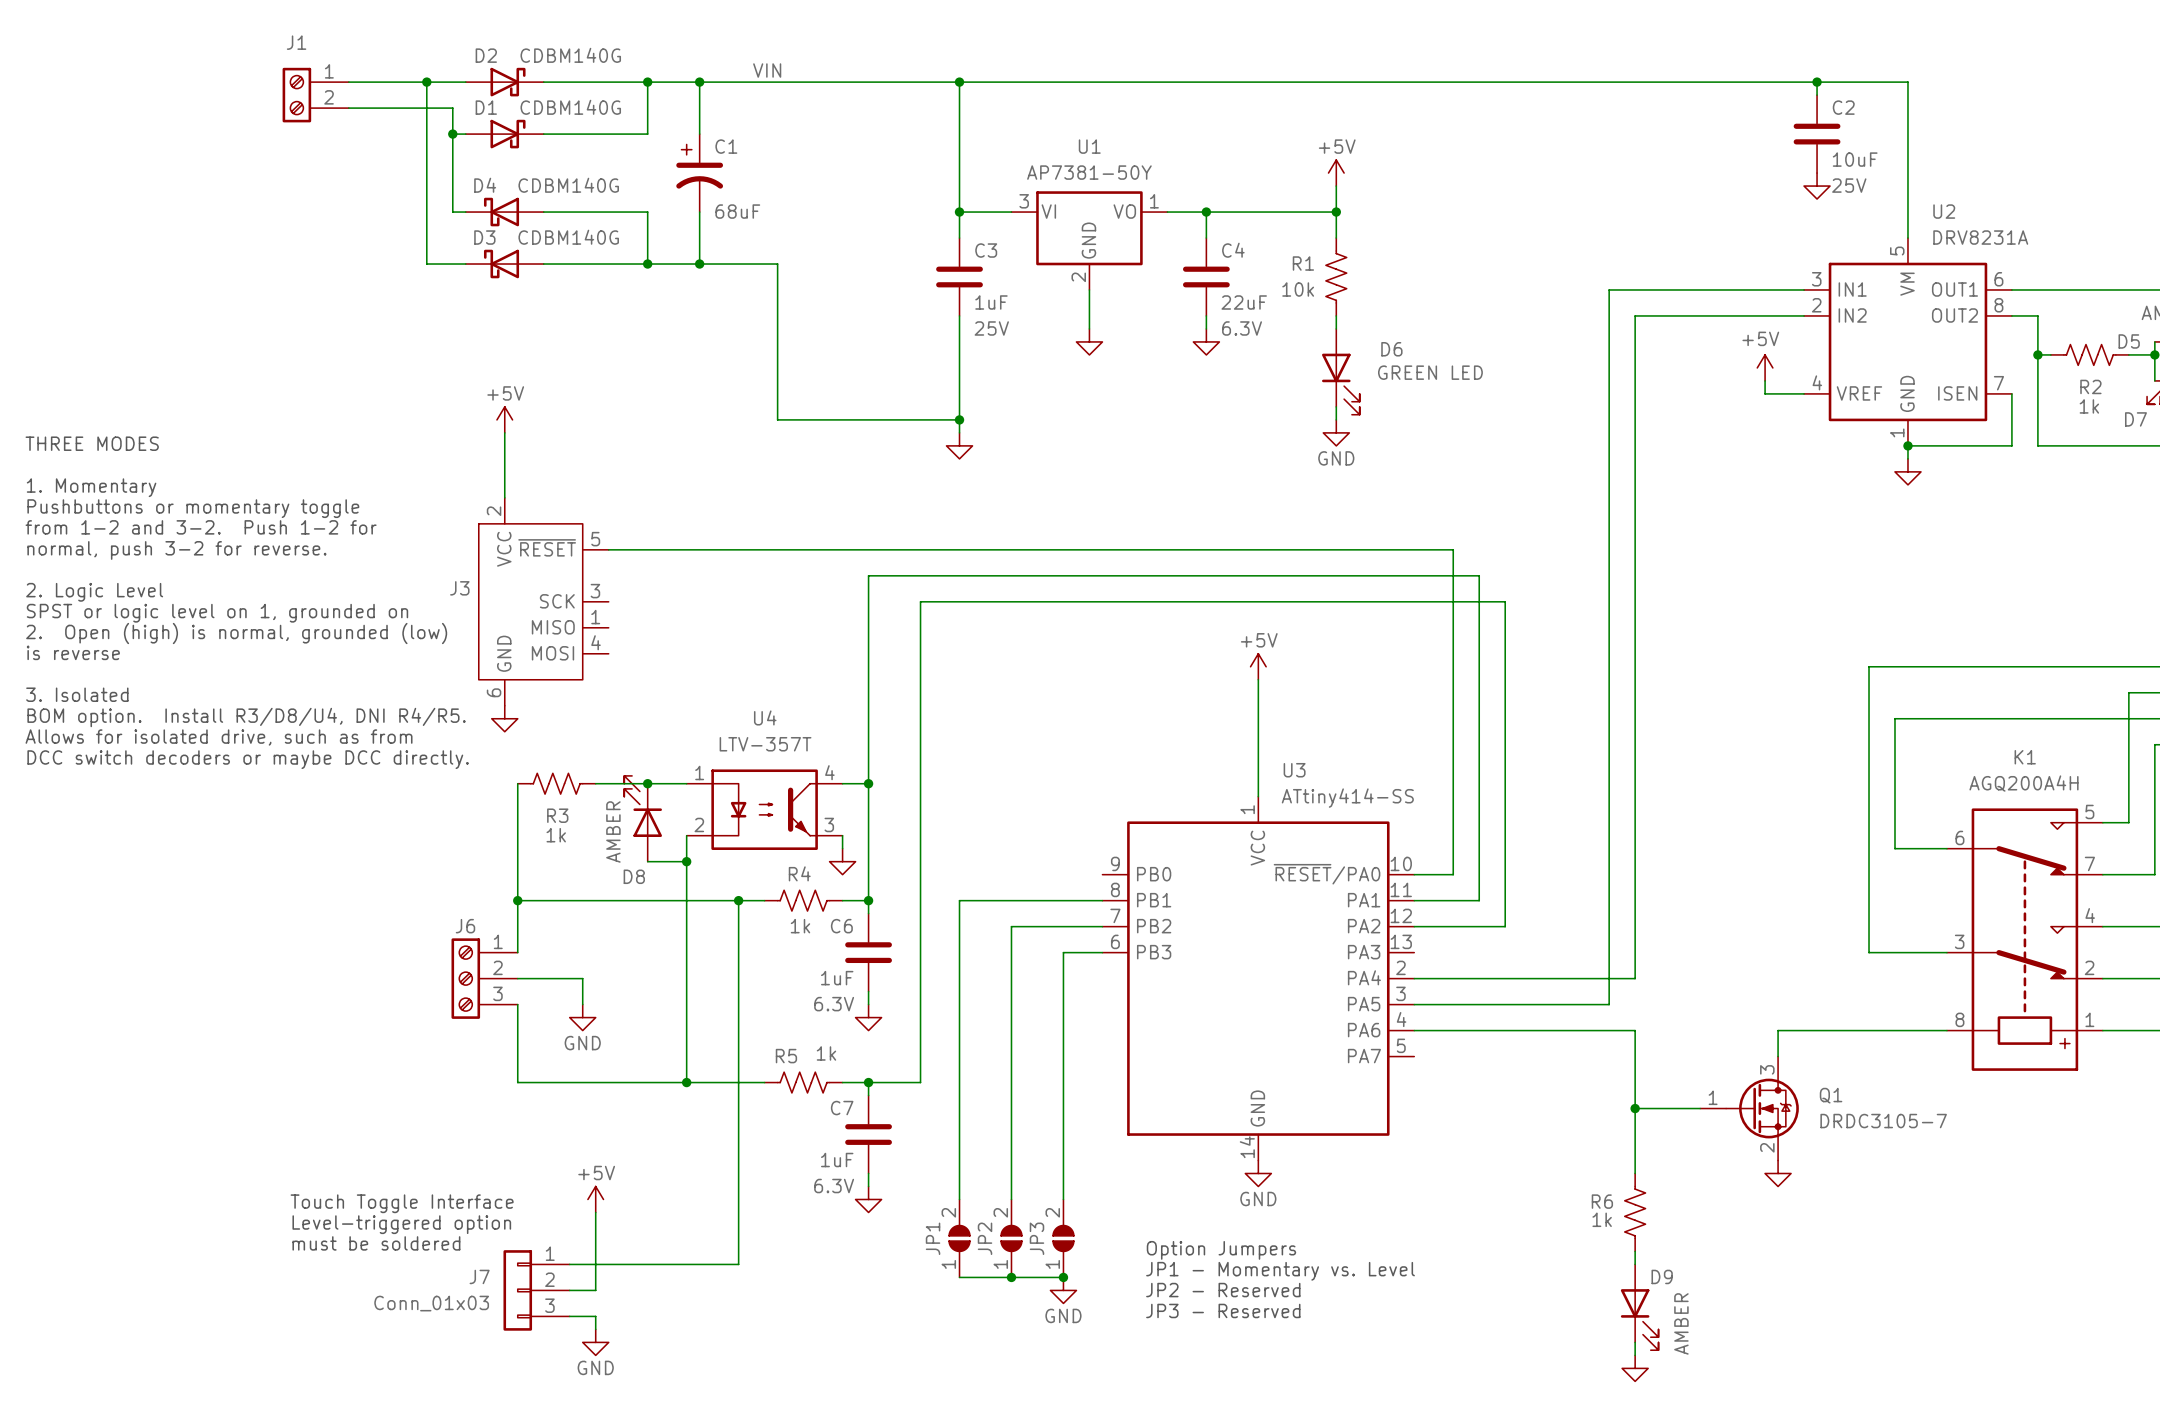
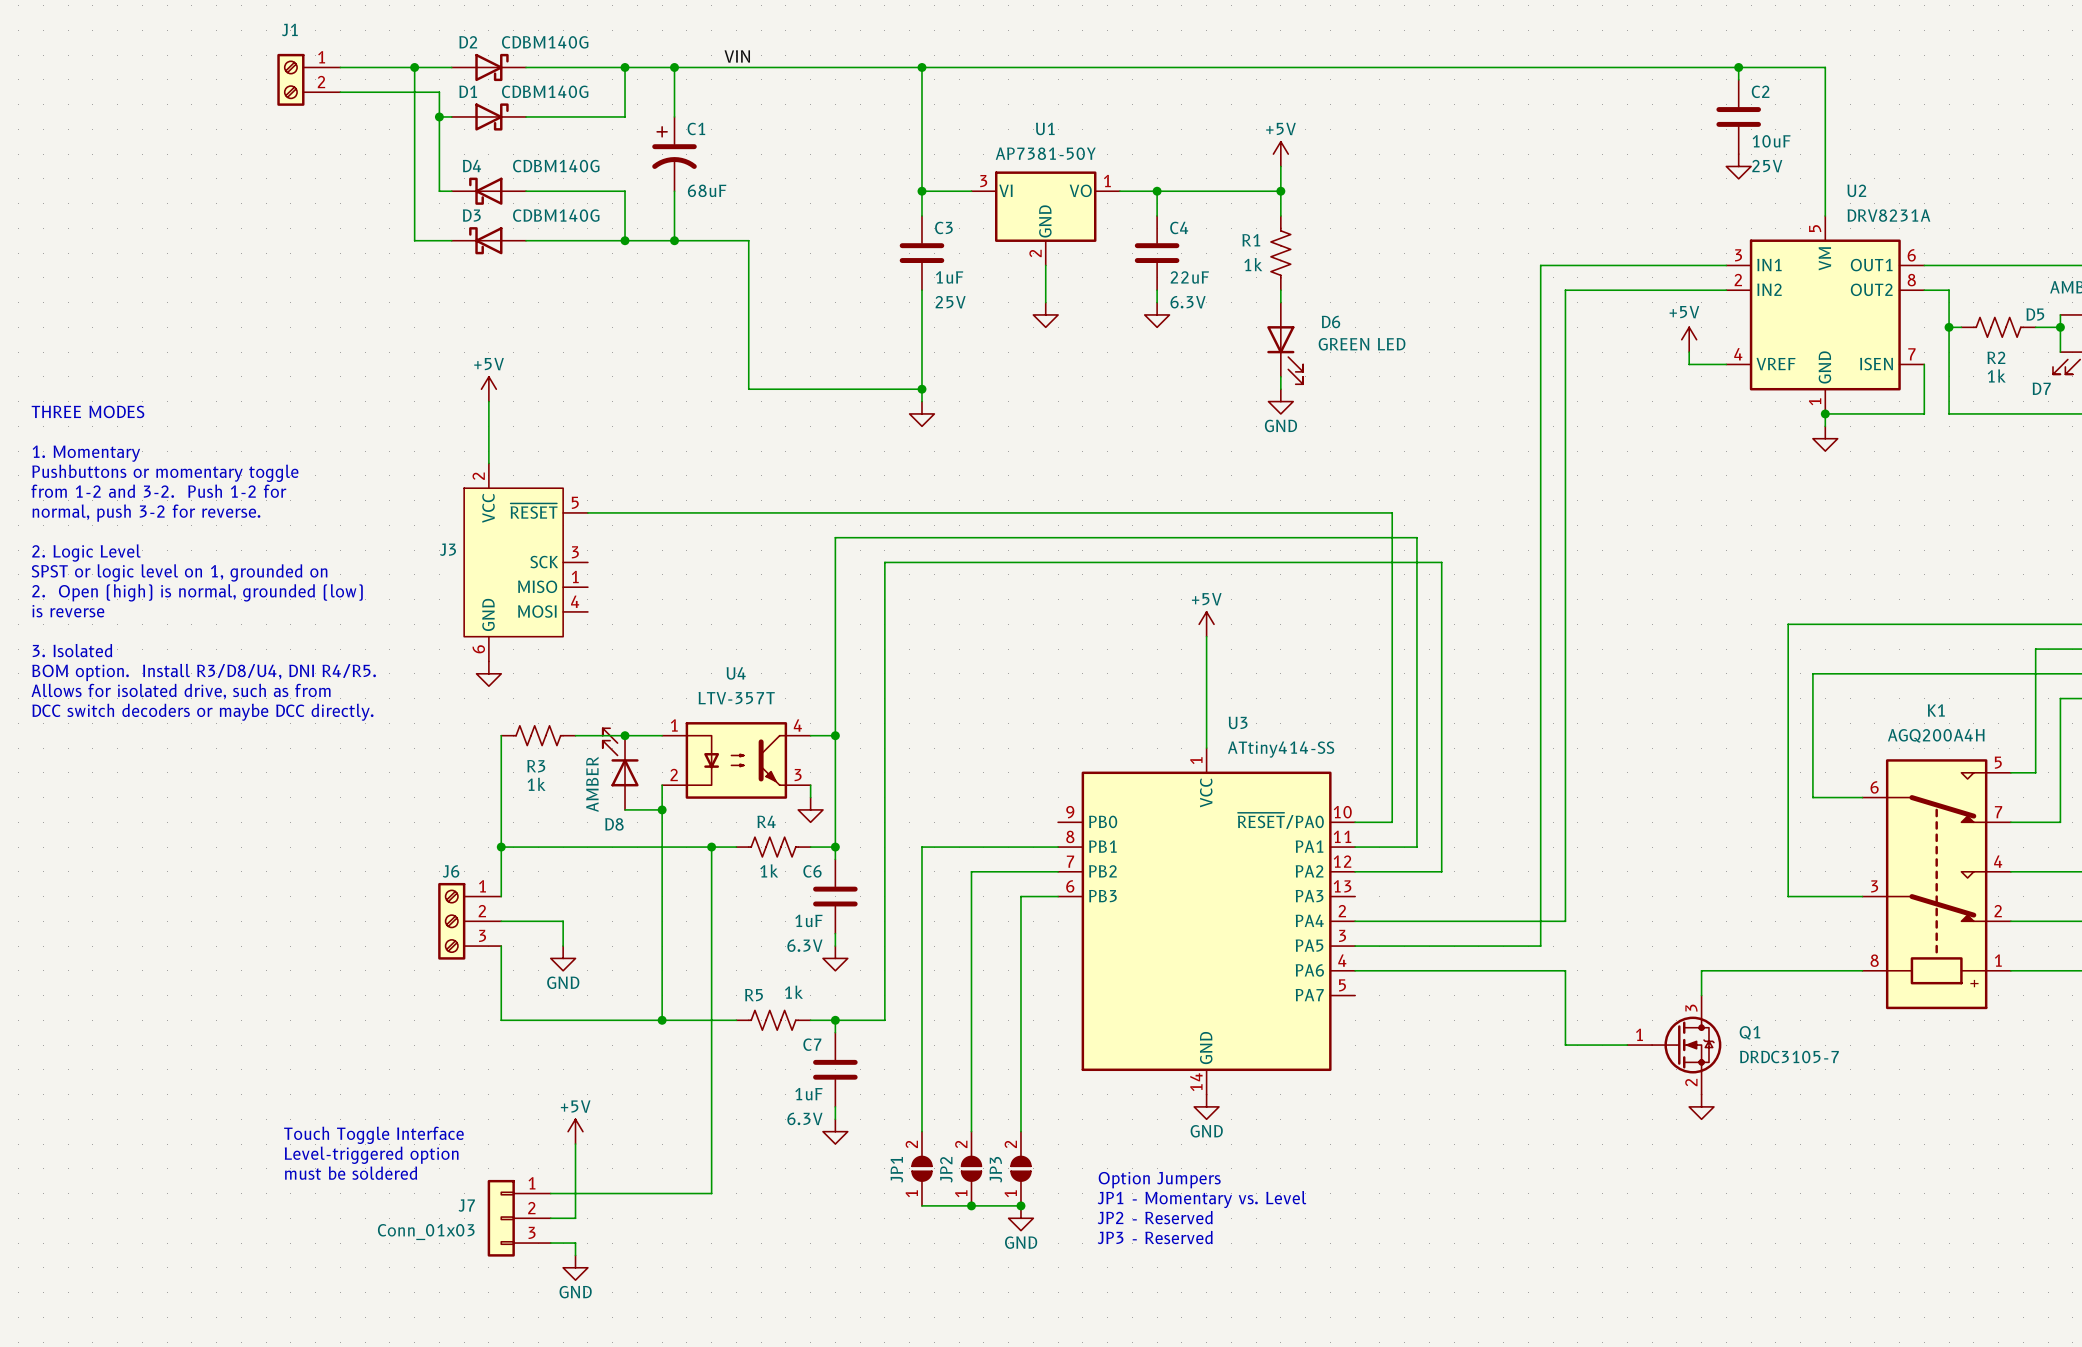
R1 value: 10k (1298, 289) -> 1k (1253, 264)
wire: (1635, 1108) (1635, 1173) -> none
junction: (1635, 1108) -> none
R6: 1k (1635, 1212) -> none
wire: (1635, 1251) (1635, 1264) -> none
D9: AMBER (1639, 1307) -> none
wire: (1635, 1342) (1635, 1355) -> none
power symbol: (1635, 1368) -> none

